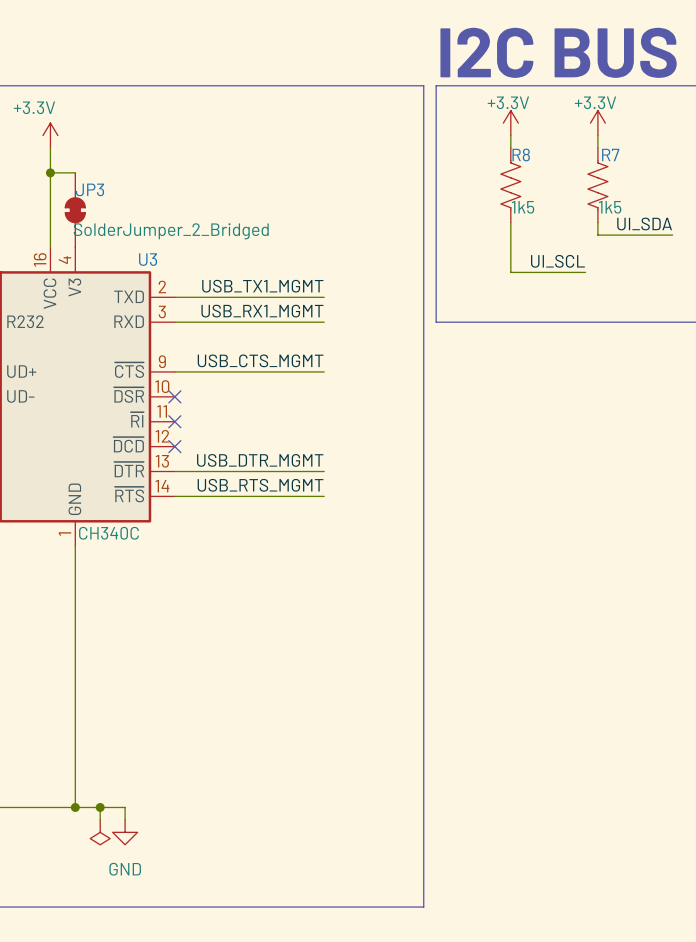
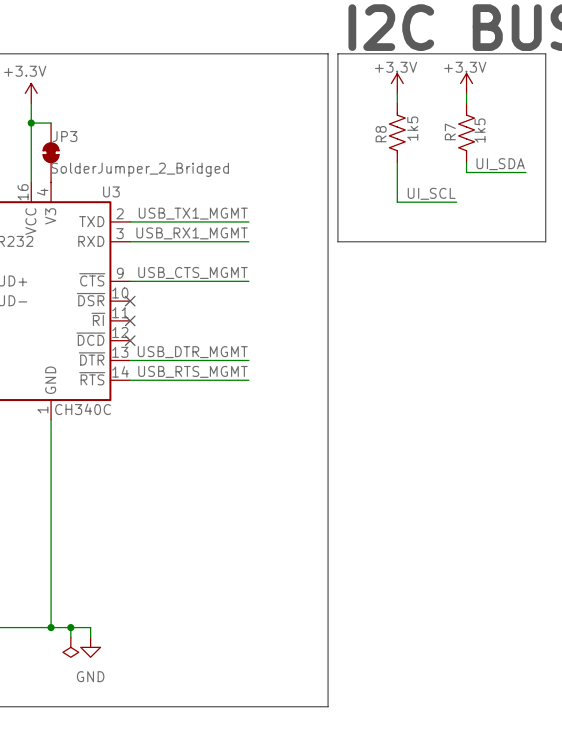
R8 name rotation: 0° (521, 154) -> 90° counterclockwise (381, 134)
R8 name position: R8 (521, 154) -> R8 (381, 134)
R7 name rotation: 0° (610, 154) -> 90° counterclockwise (450, 131)
R7 name position: R7 (610, 154) -> R7 (450, 131)
R8 value rotation: 0° (523, 207) -> 90° counterclockwise (412, 128)
R7 value rotation: 0° (610, 207) -> 90° counterclockwise (480, 130)

